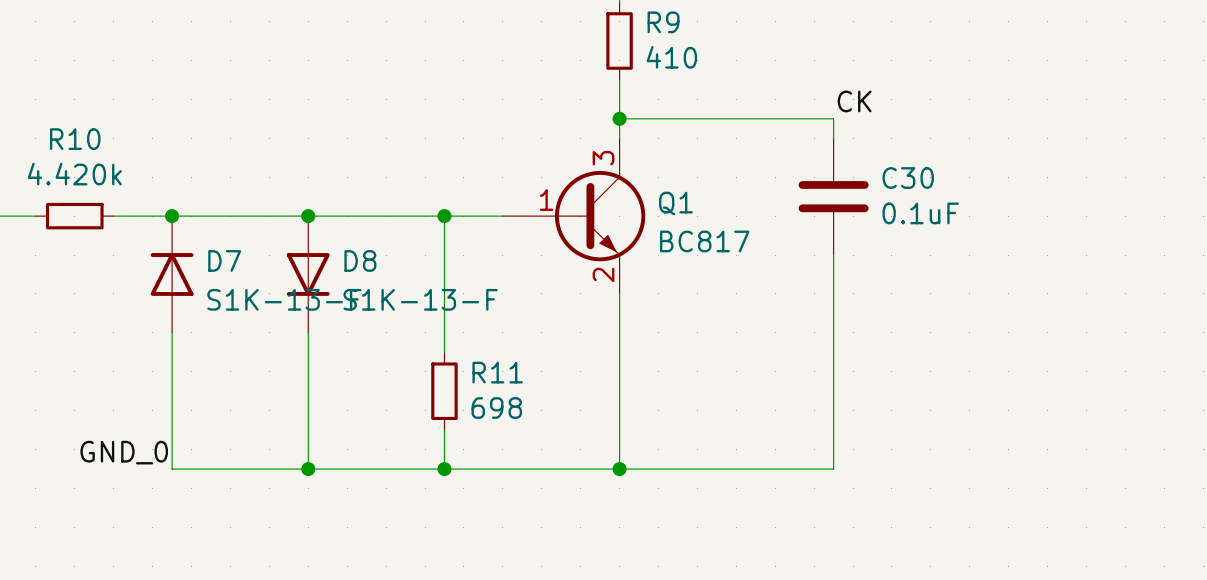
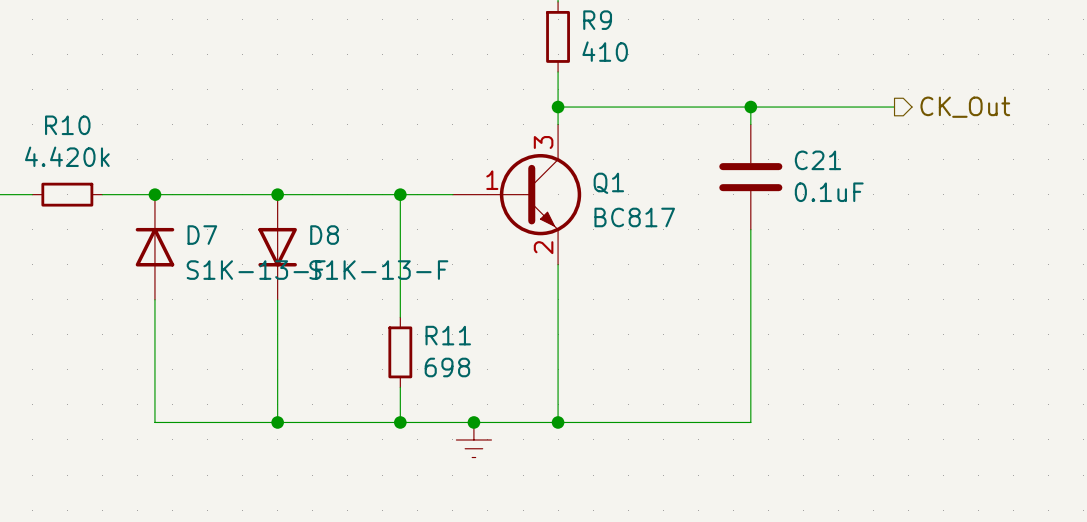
label: CK (854, 101) -> none
wire: none -> (750, 107) (894, 107)
junction: none -> (750, 107)
hierarchical label: none -> CK_Out (965, 107)
C30 name: C30 (908, 178) -> C21 (817, 160)
label: GND_0 (124, 452) -> none
junction: none -> (473, 422)
power symbol: none -> (473, 439)

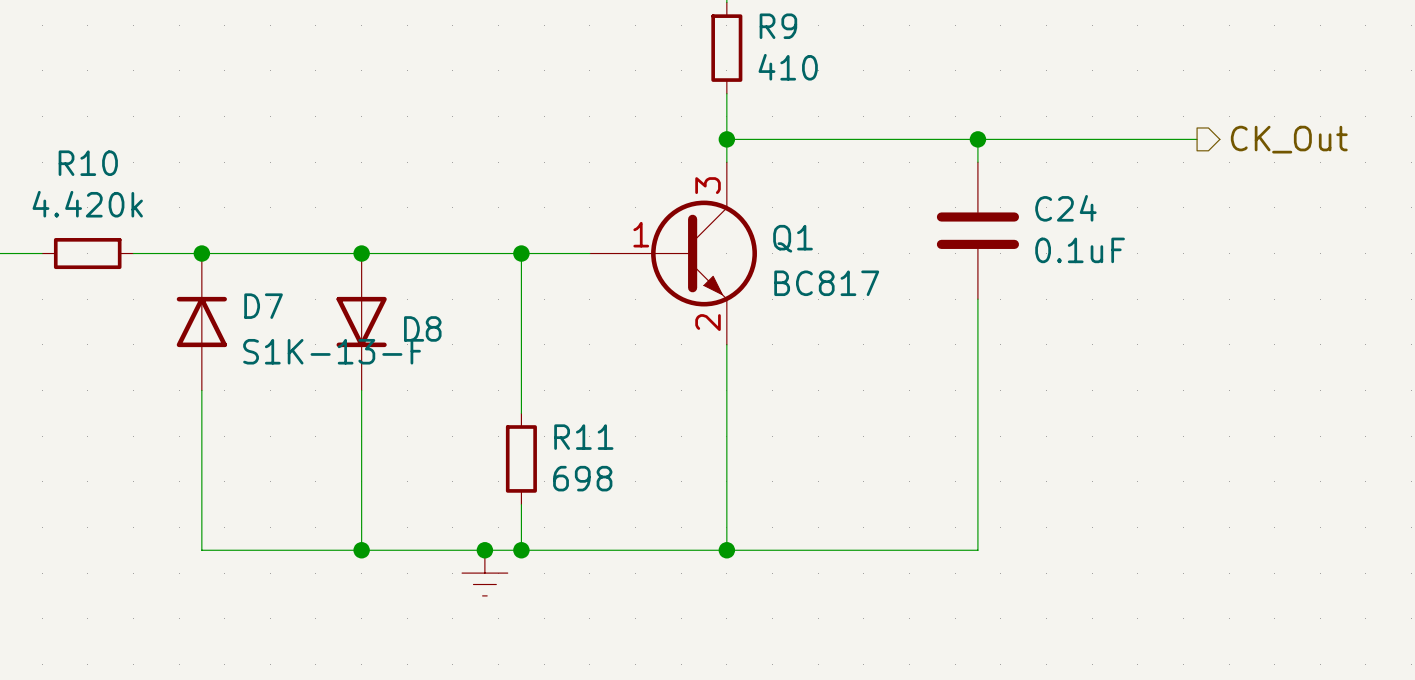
wire: none -> (1165, 139) (1197, 139)
hierarchical label position: CK_Out (965, 107) -> CK_Out (1289, 139)
C21 name: C21 (817, 160) -> C24 (1065, 208)
D8 name position: D8 (324, 235) -> D8 (422, 328)
D8 value: S1K-13-F (378, 270) -> none
junction: none -> (484, 550)
junction: (473, 422) -> none
power symbol position: (473, 439) -> (484, 573)

